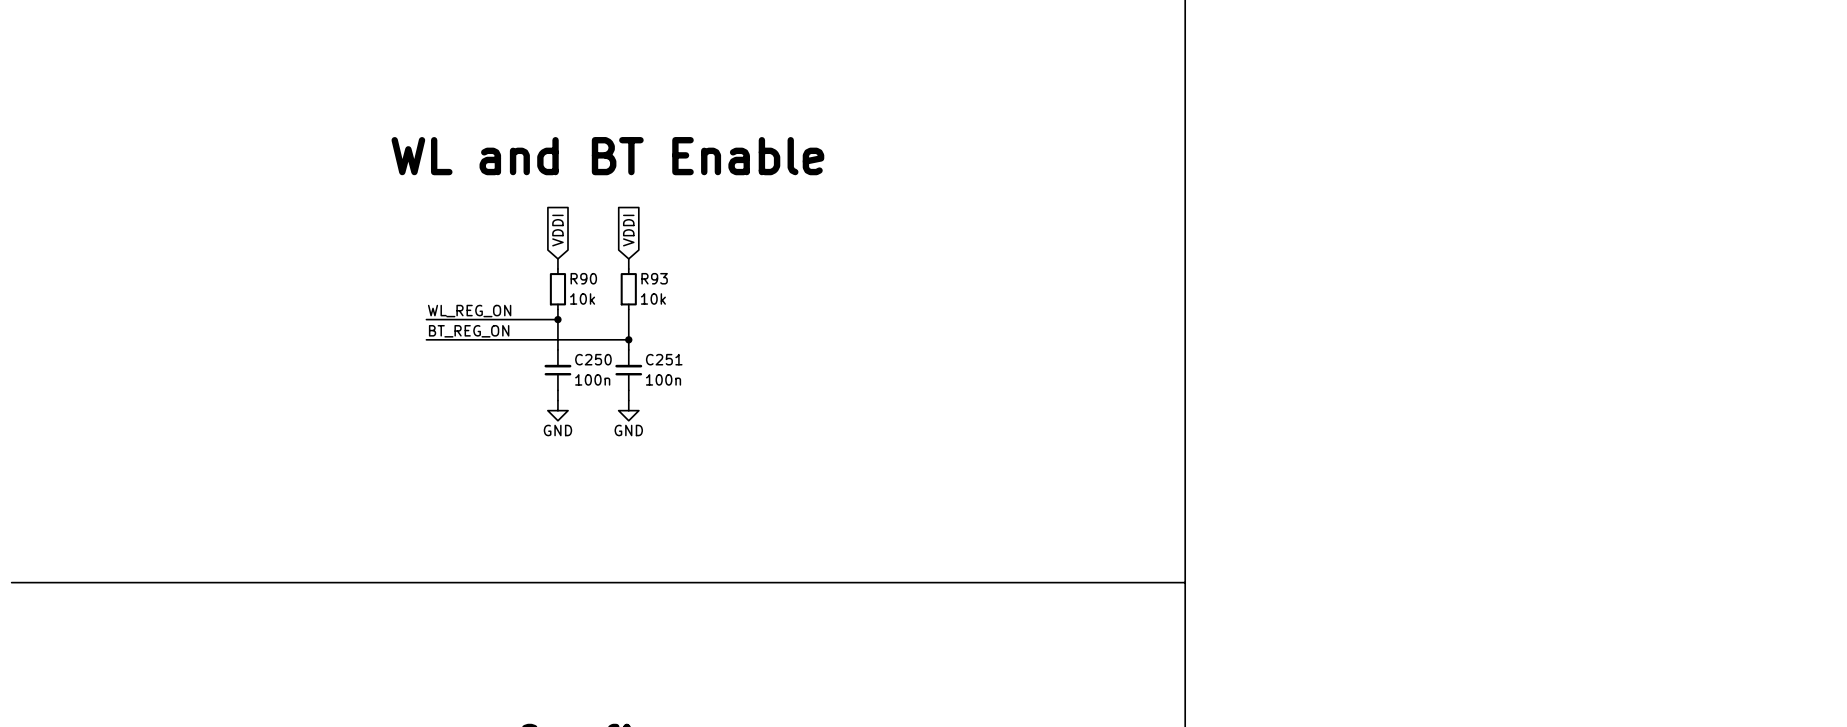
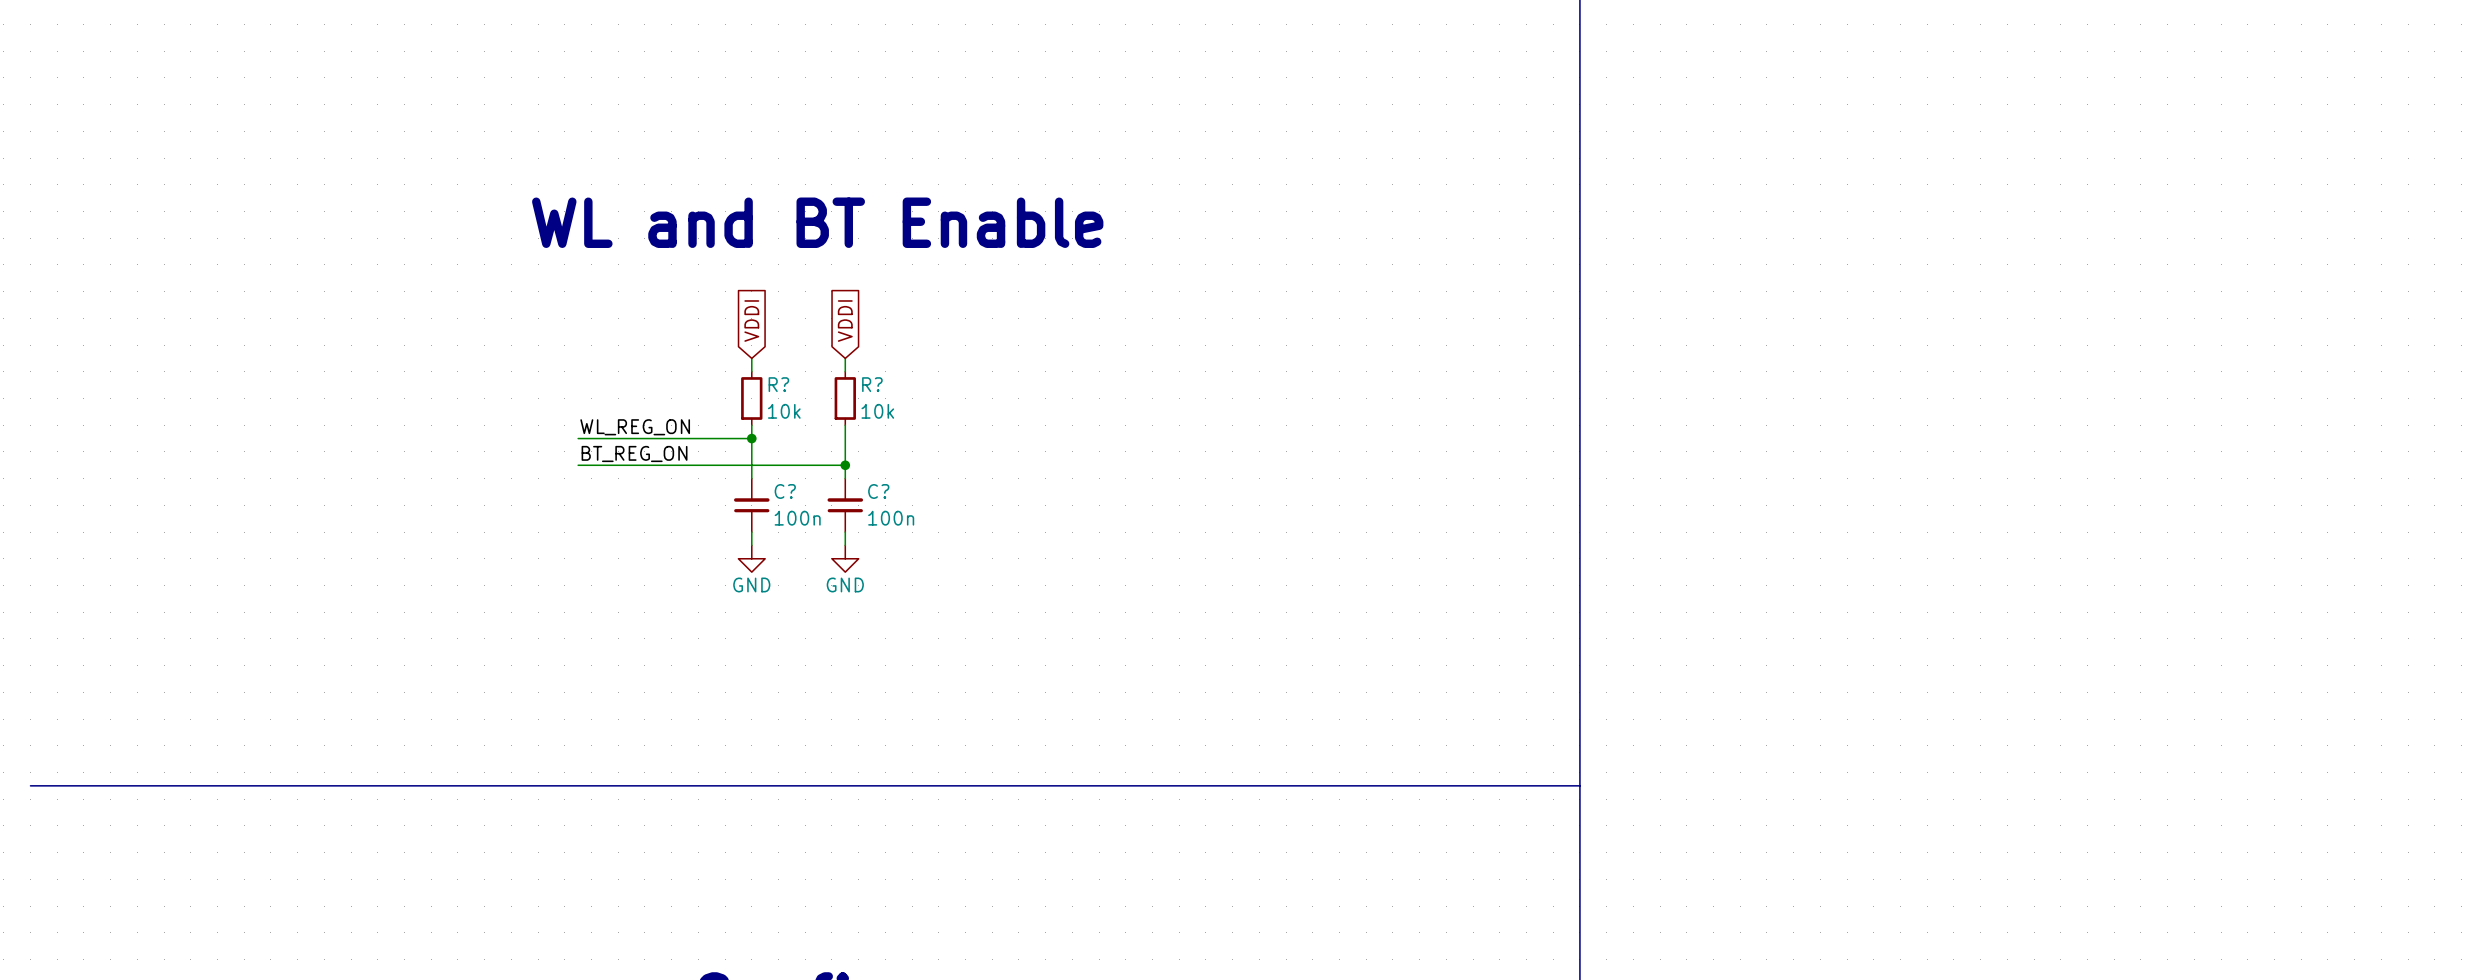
R90 name: R90 (583, 278) -> R? (778, 384)
R93 name: R93 (654, 278) -> R? (872, 384)
C250 name: C250 (593, 359) -> C? (785, 491)
C251 name: C251 (664, 359) -> C? (878, 491)

